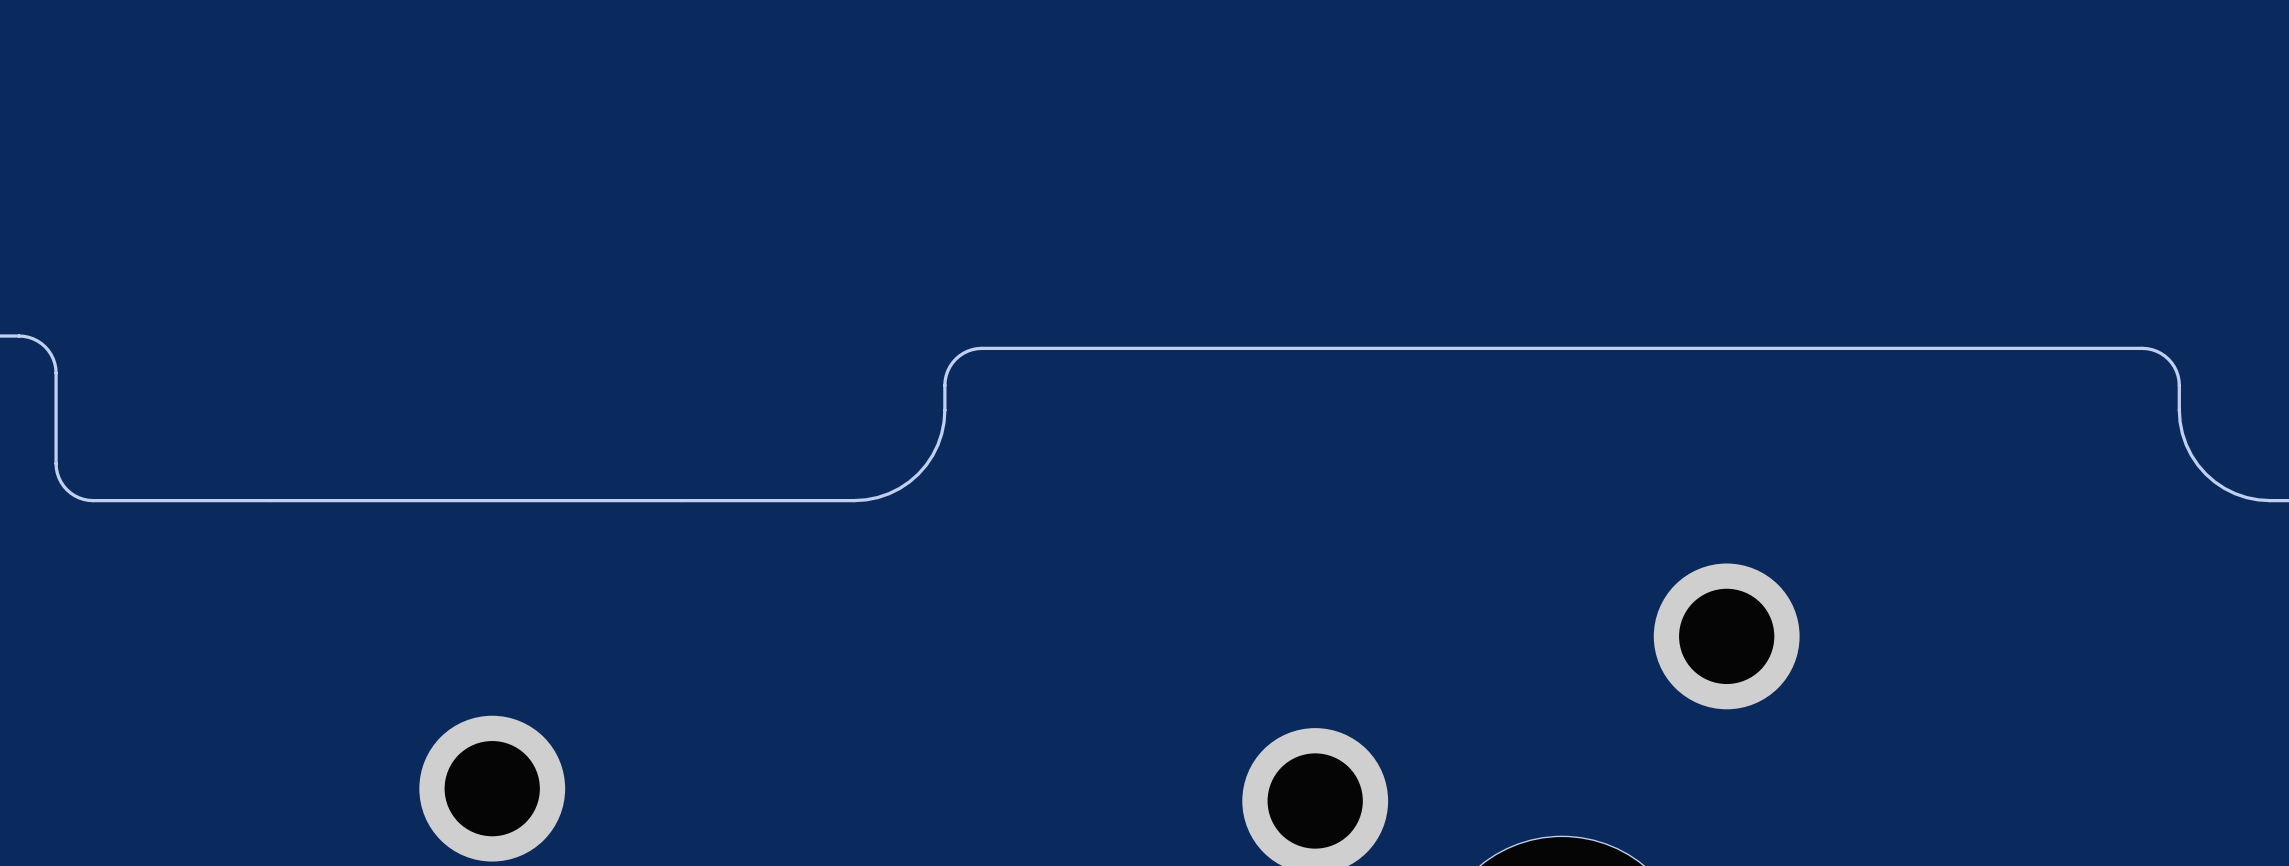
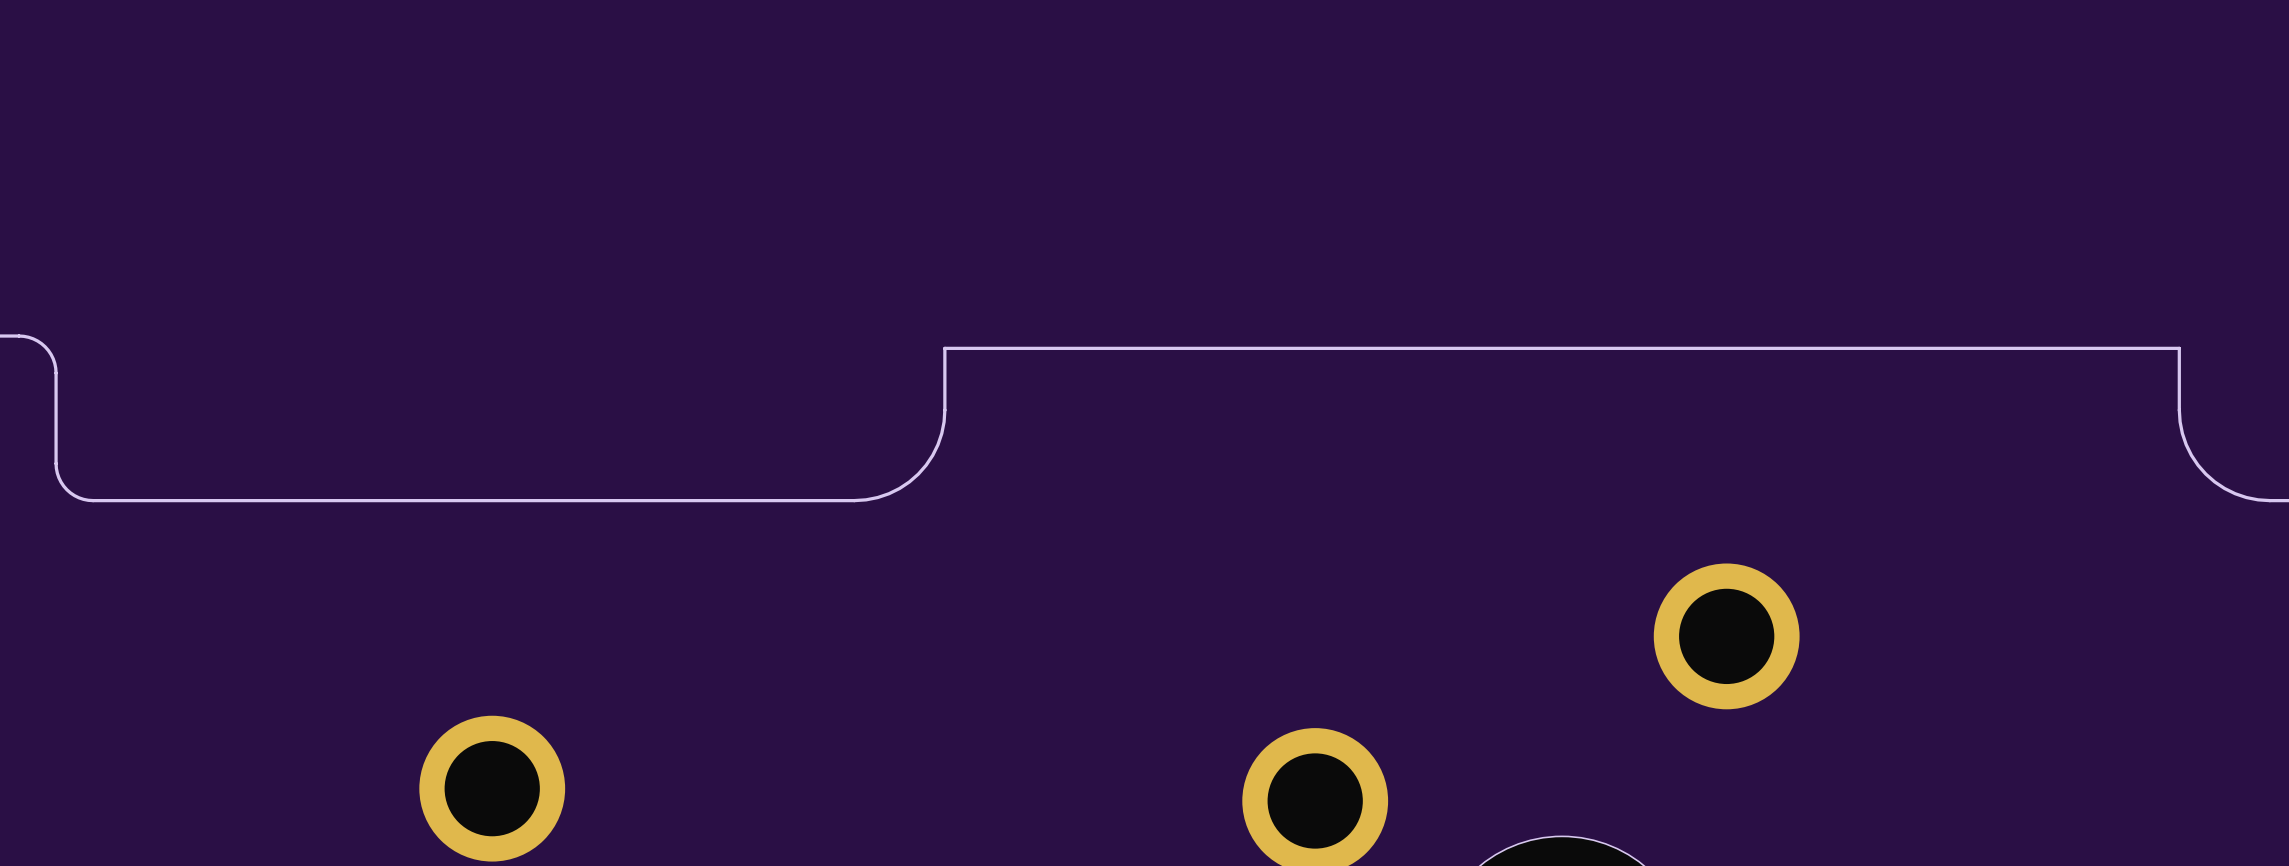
board edge: (981, 348) (967, 351) (955, 359) (947, 371) (944, 385) -> (981, 348) (944, 348) (944, 385)
board edge: (2142, 348) (2156, 351) (2168, 359) (2176, 371) (2179, 385) -> (2142, 348) (2179, 348) (2179, 385)

